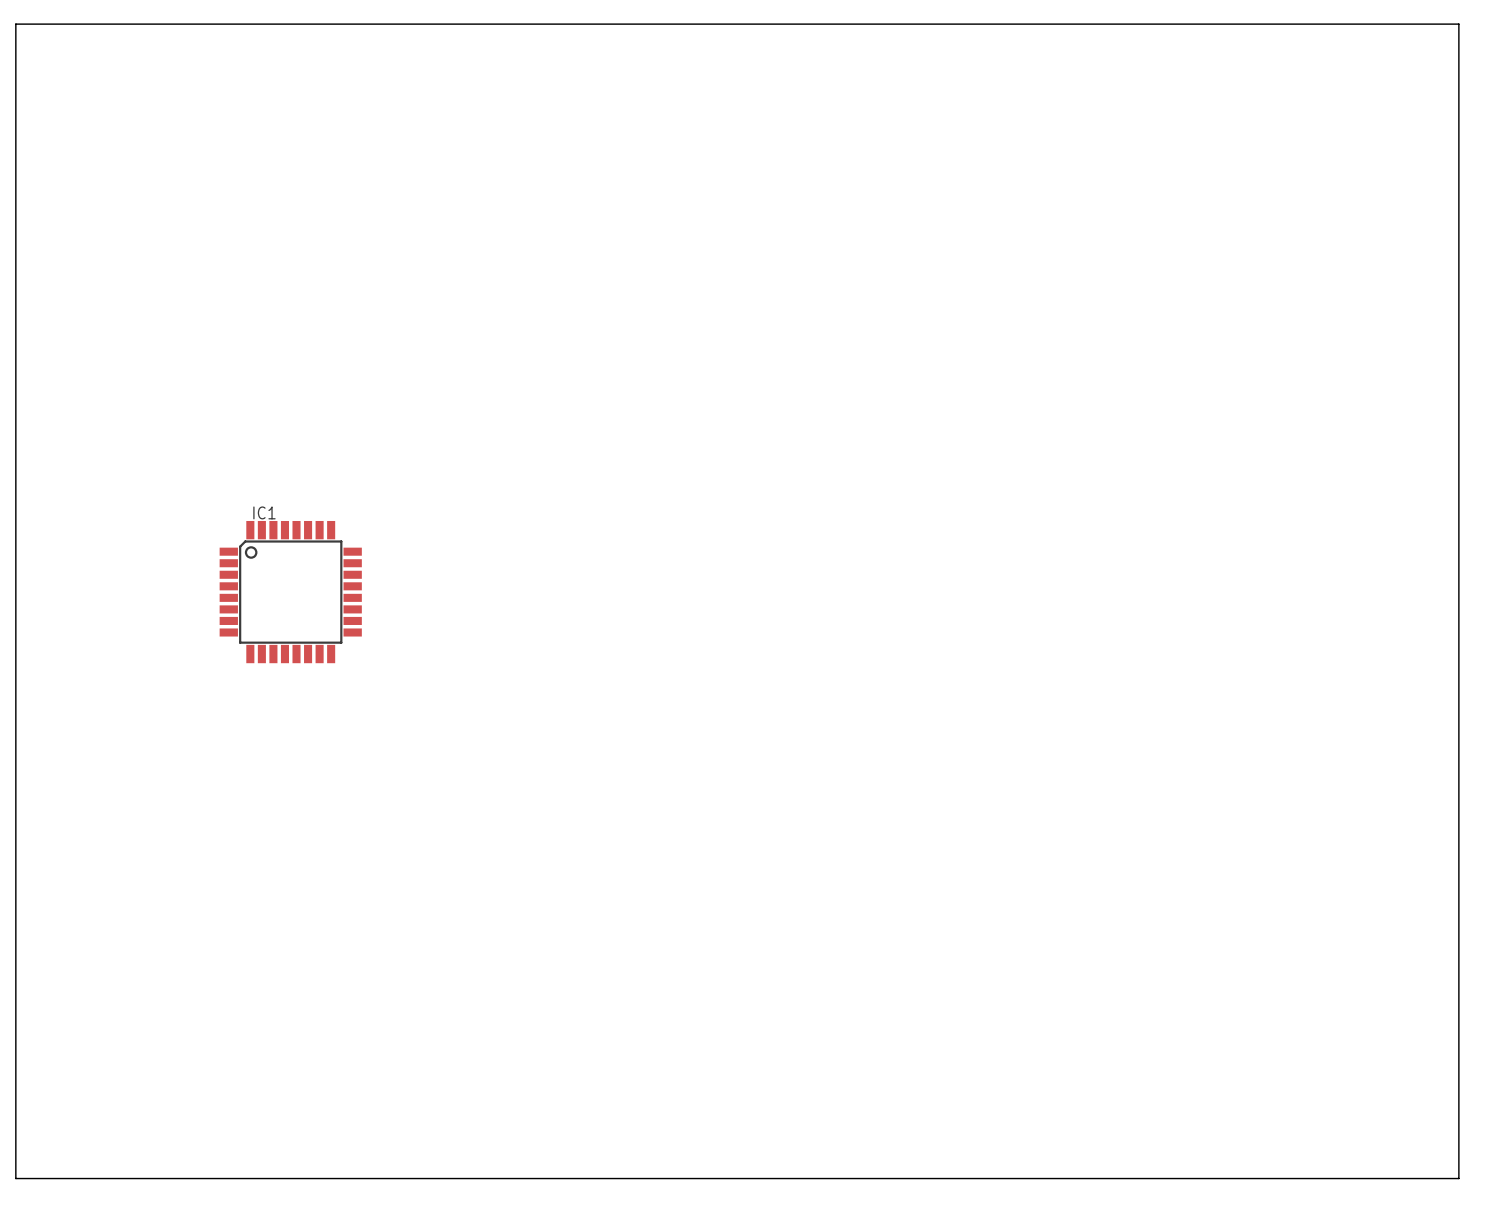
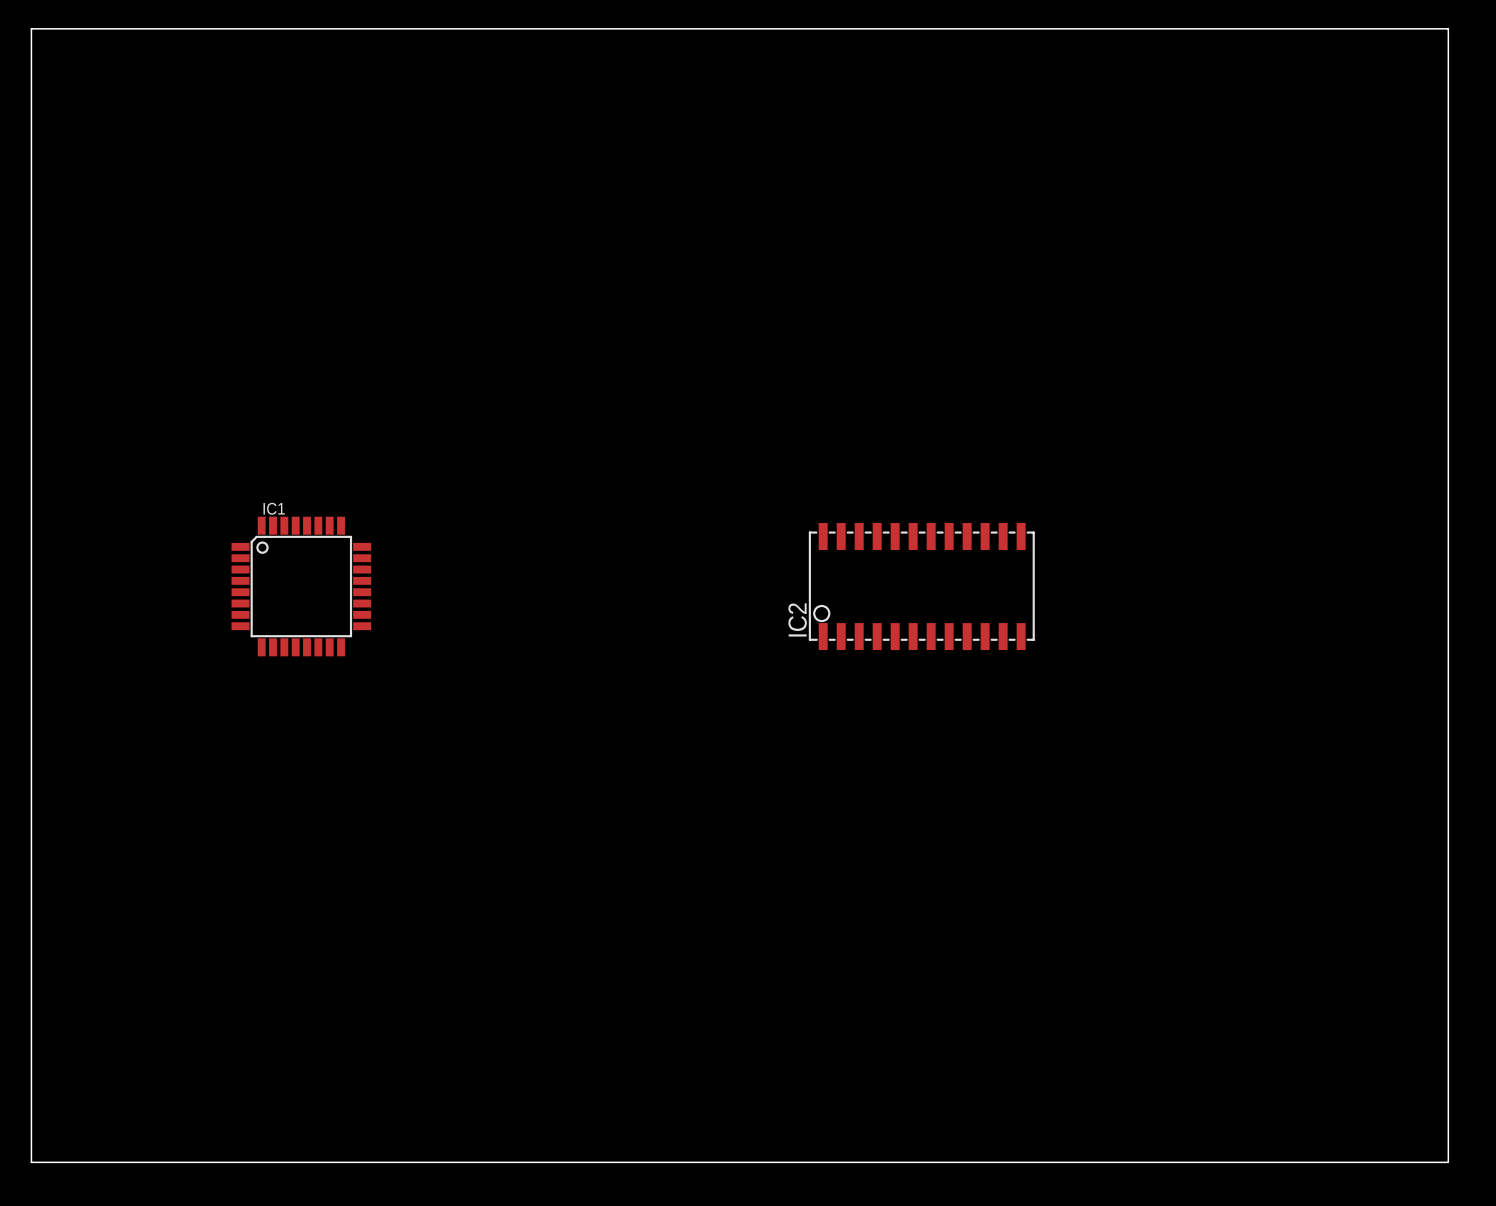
IC2: none -> (921, 586)

